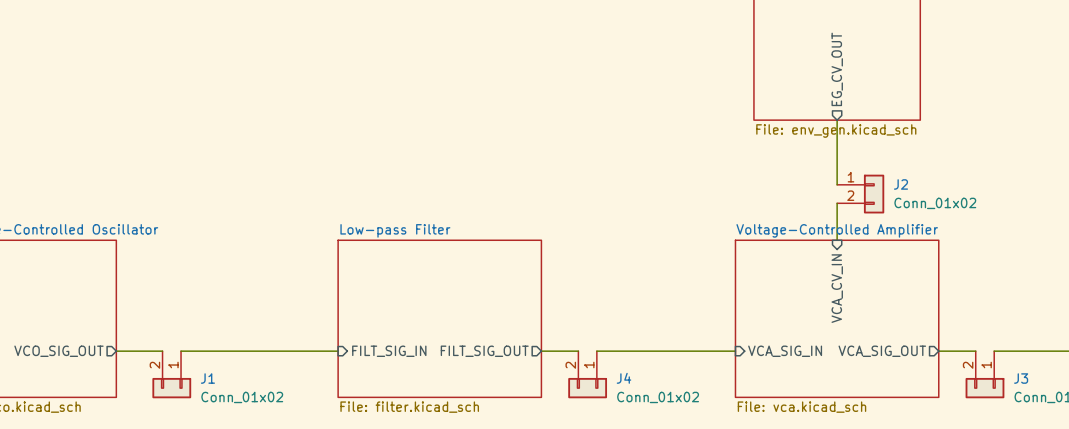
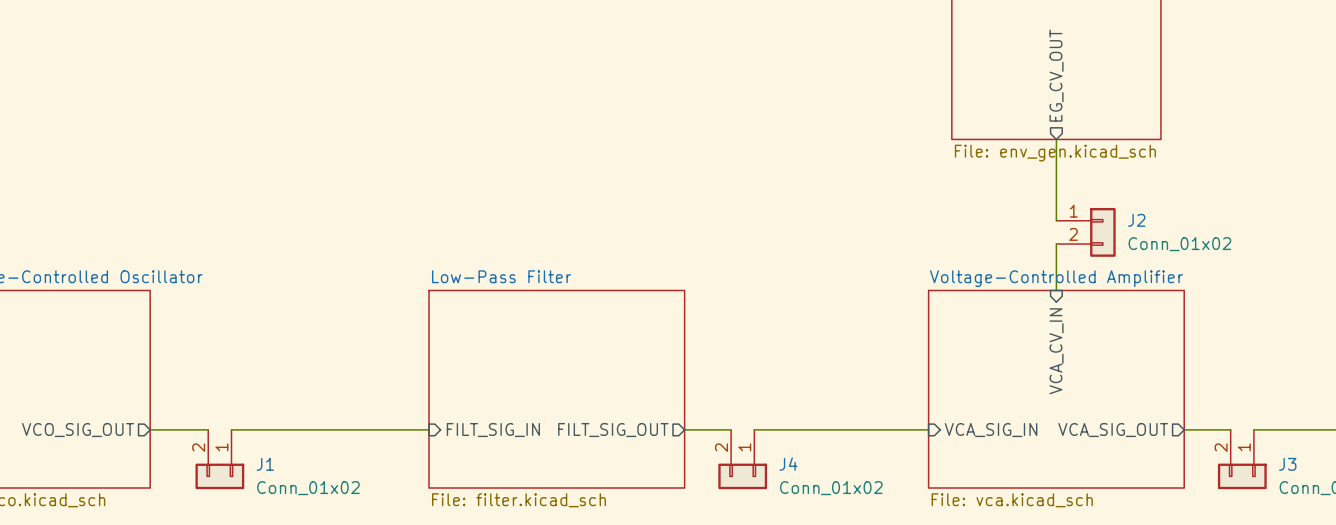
sheet Low-pass Filter name: Low-pass Filter (395, 230) -> Low-Pass Filter (501, 276)

